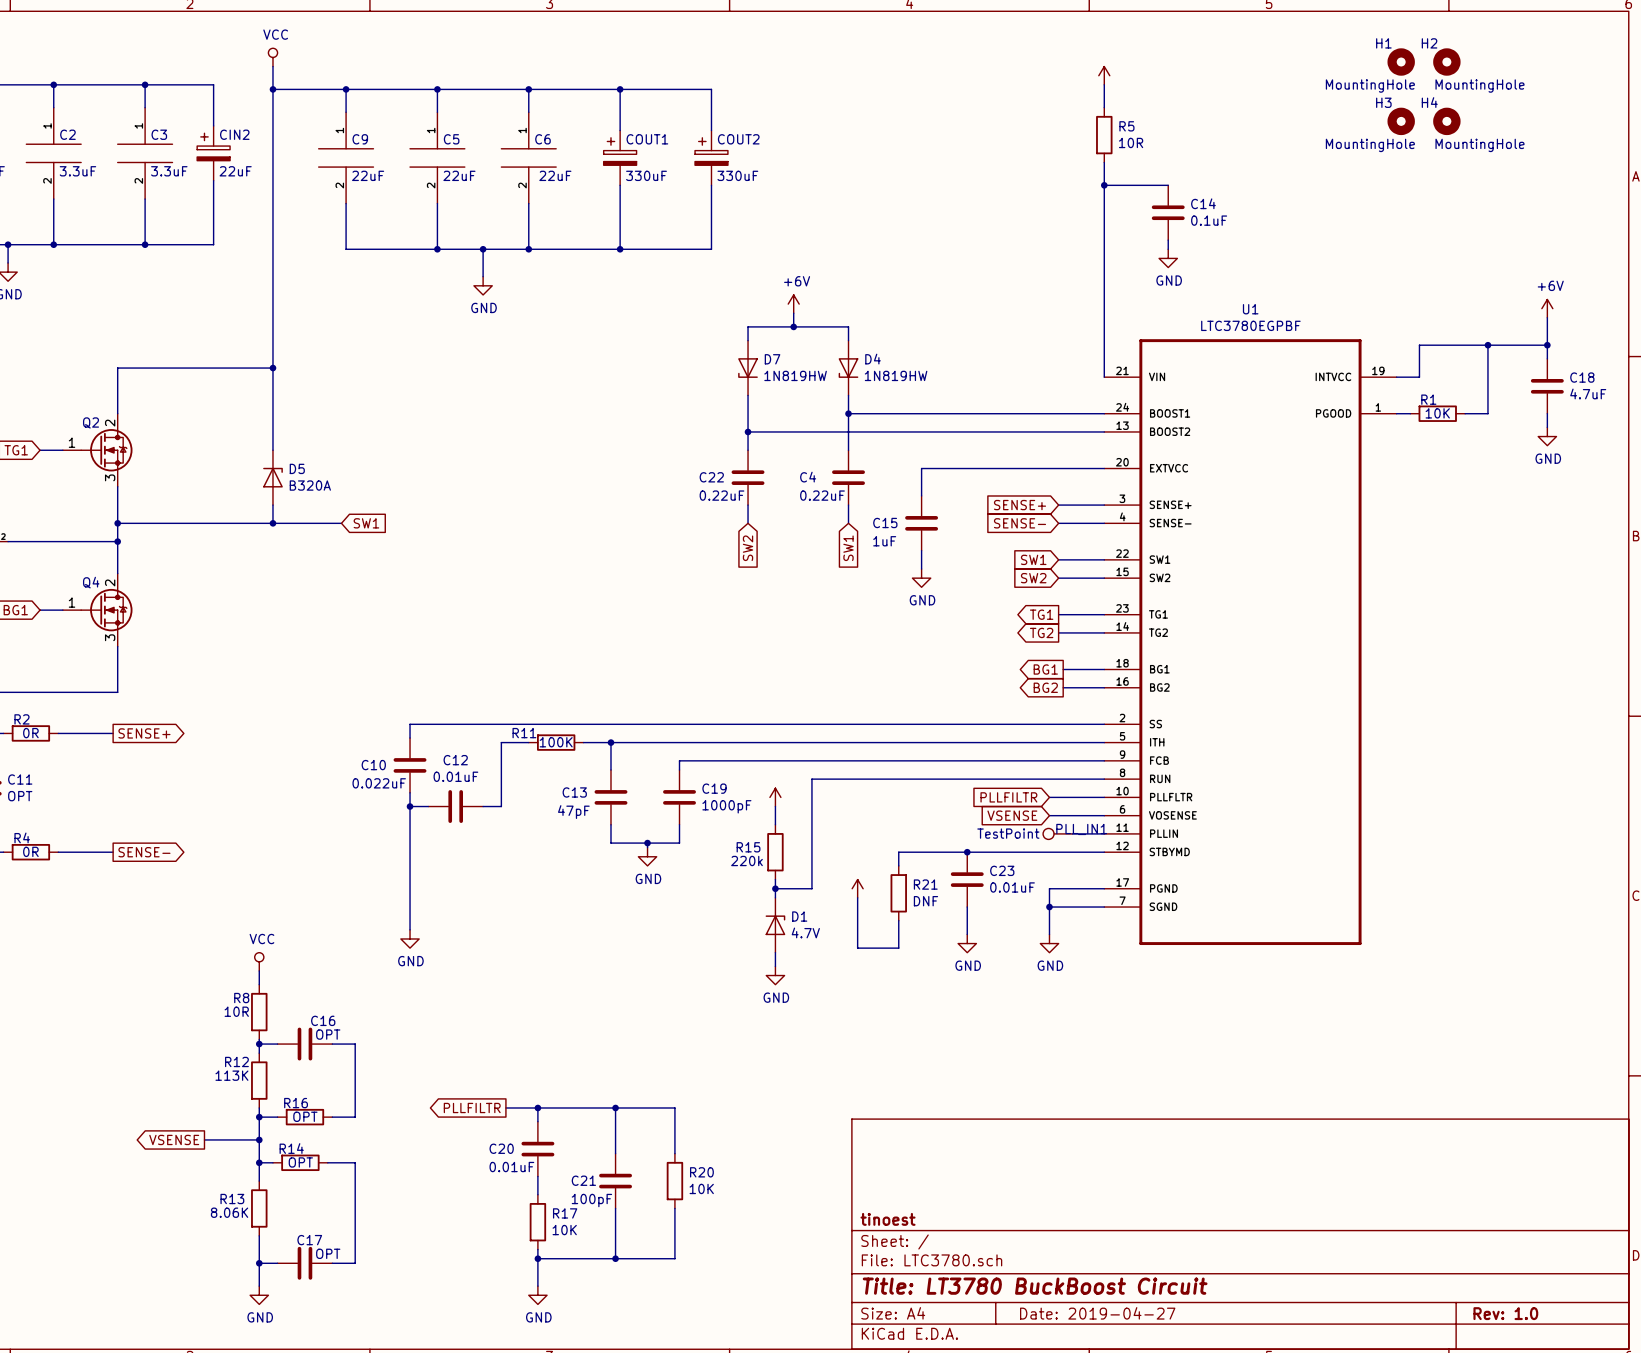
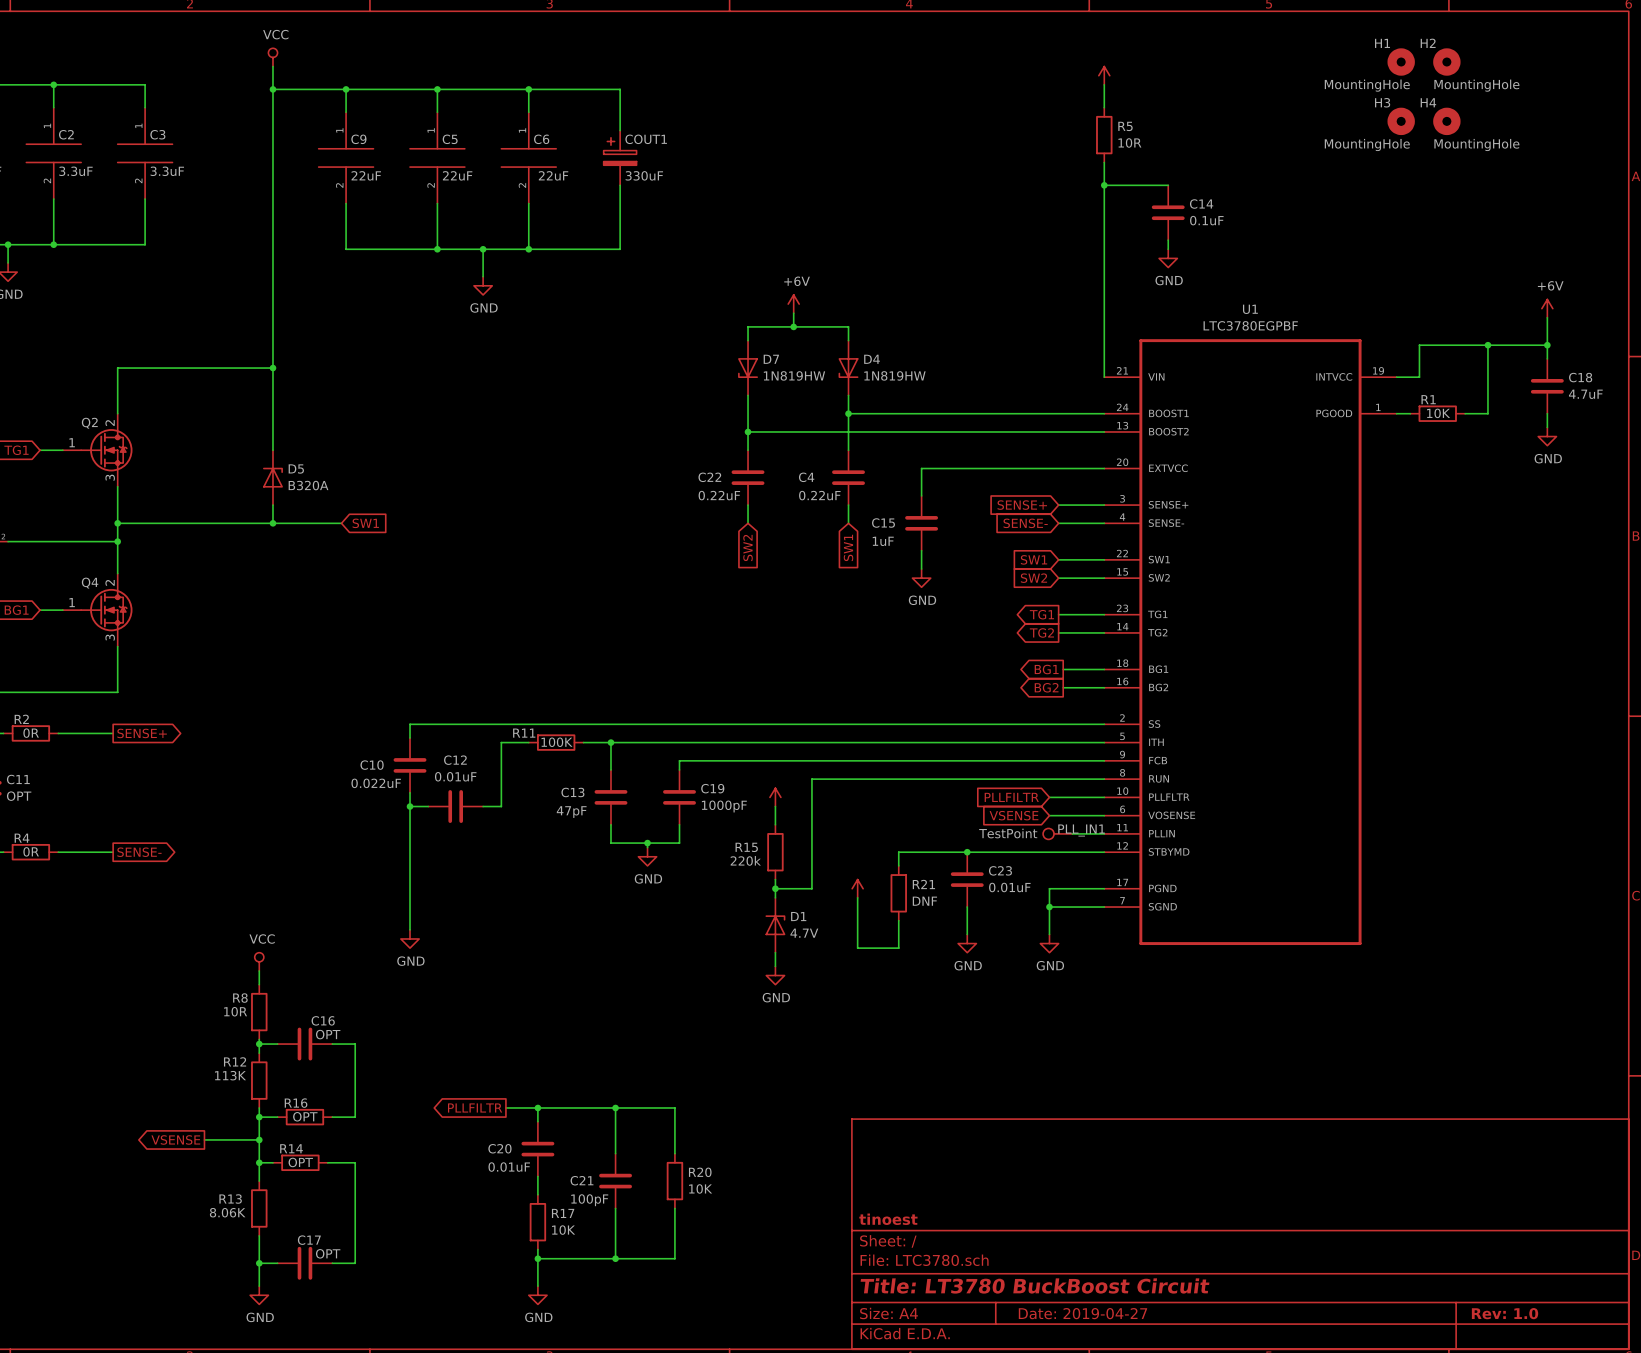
wire: (145, 84) (213, 84) (213, 125) -> none
junction: (145, 84) -> none
wire: (620, 89) (711, 89) (711, 130) -> none
junction: (620, 89) -> none
CIN2: 22uF (213, 153) -> none
COUT2: 330uF (711, 157) -> none
wire: (213, 180) (213, 244) (145, 244) -> none
wire: (711, 185) (711, 249) (620, 249) -> none
junction: (145, 244) -> none
junction: (620, 249) -> none

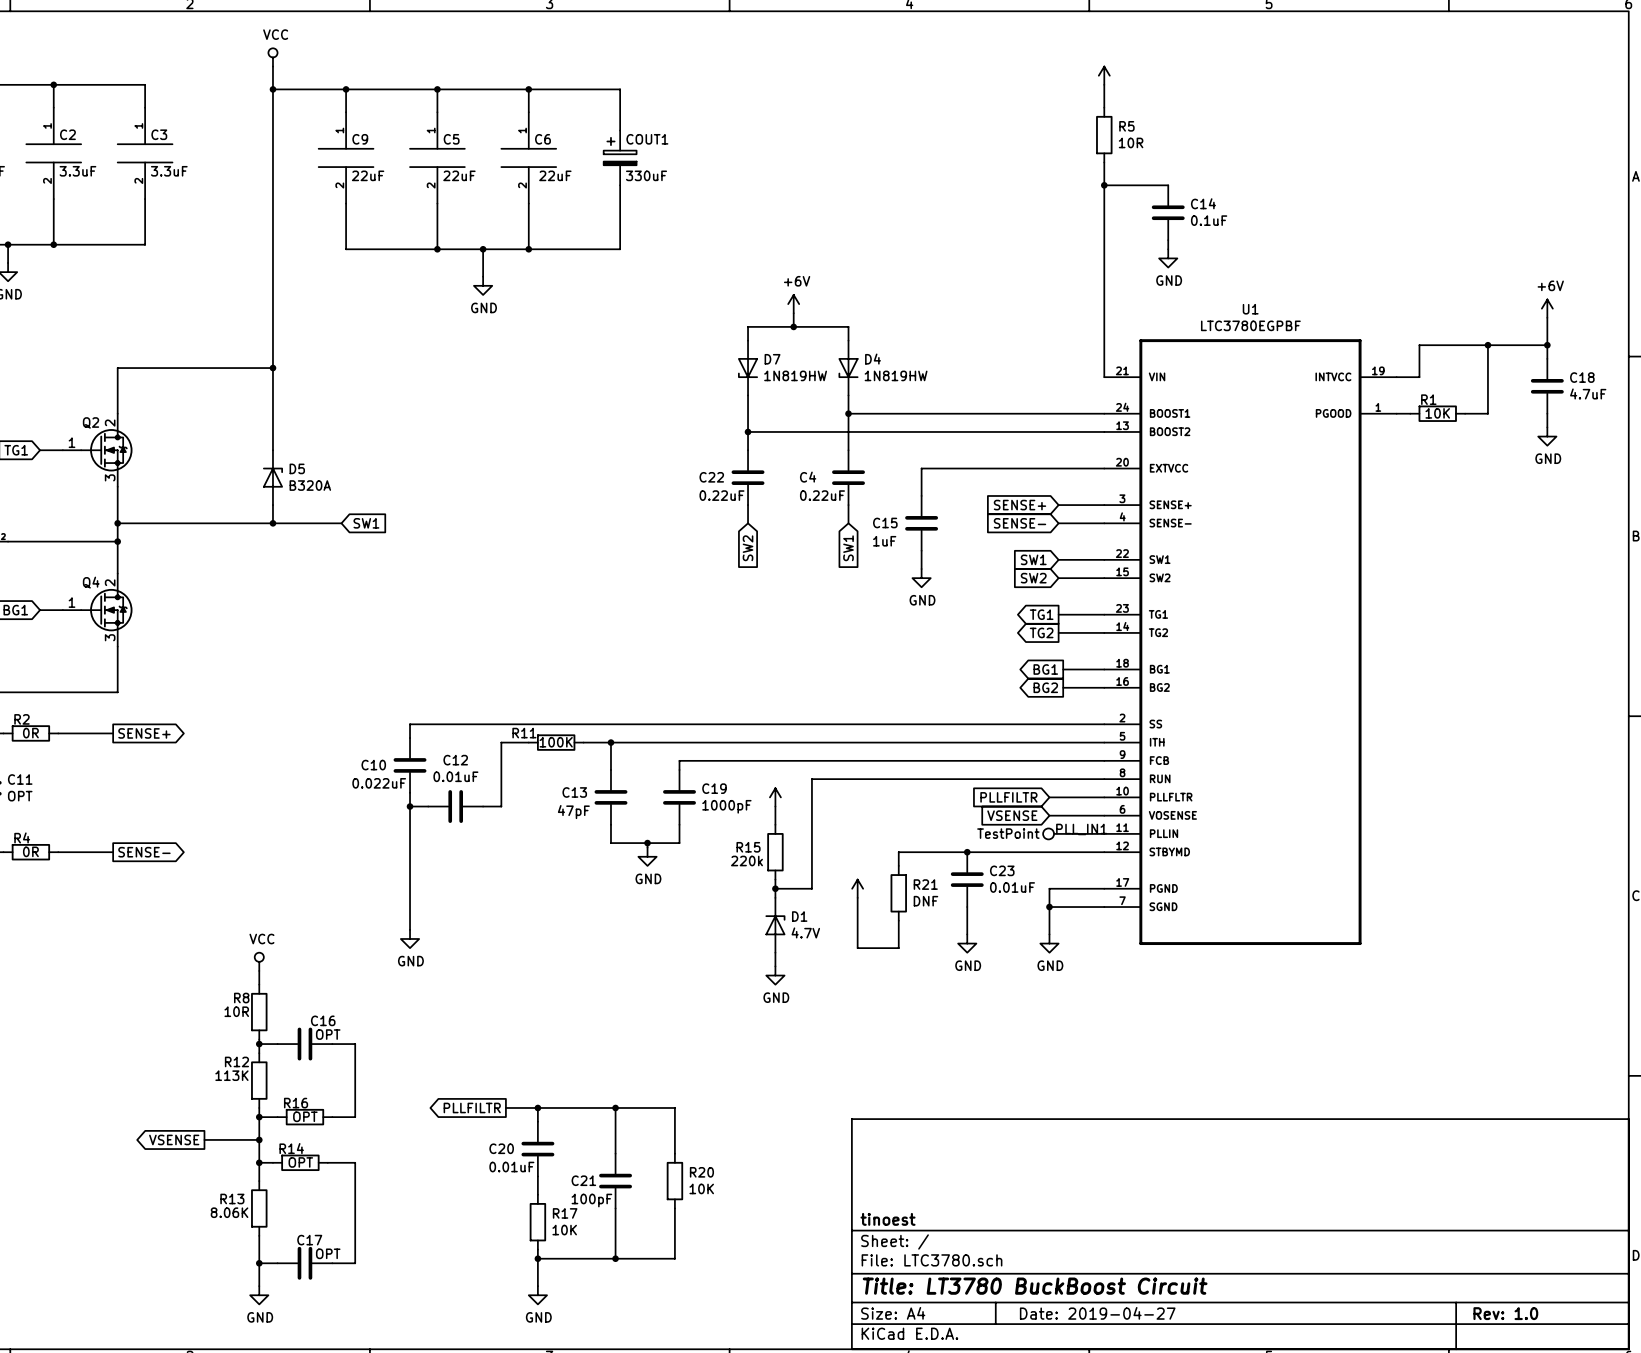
H1: MountingHole (1401, 62) -> none
H2: MountingHole (1446, 62) -> none
H3: MountingHole (1401, 121) -> none
H4: MountingHole (1446, 121) -> none

